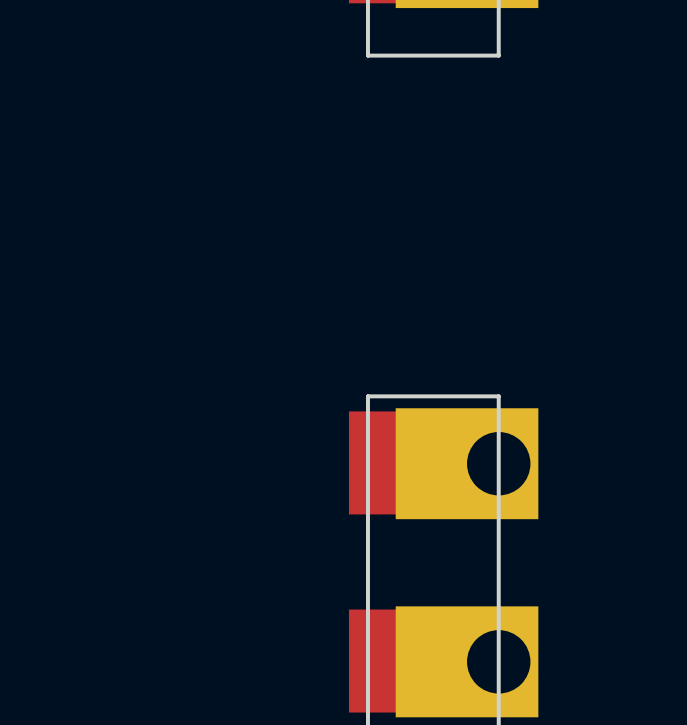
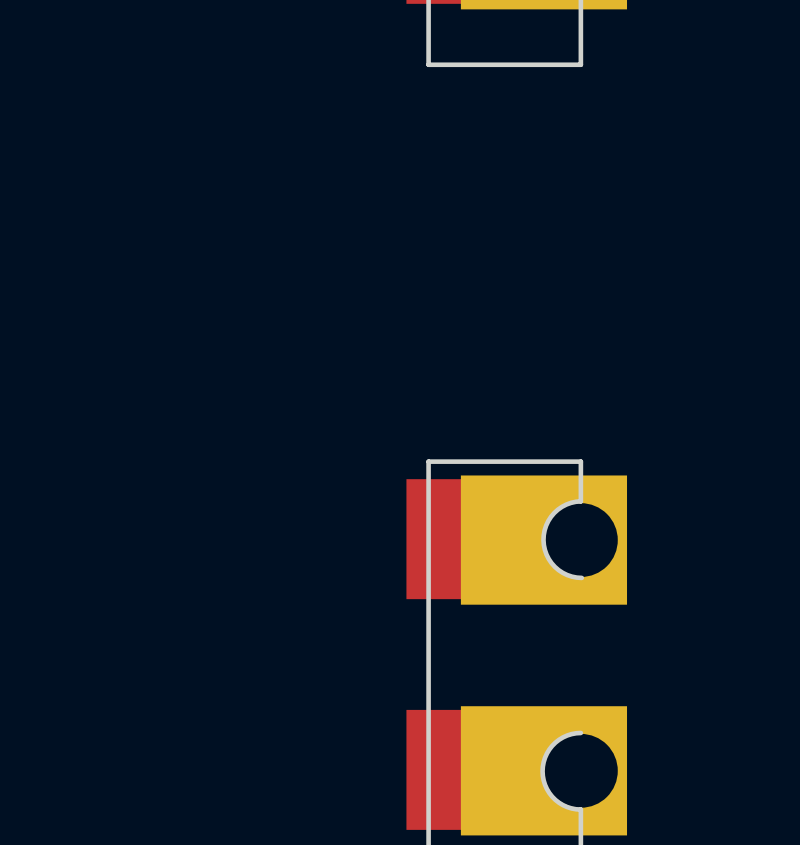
board edge: (498, 430) (498, 695) -> (580, 732) (567, 735) (552, 745) (545, 757) (542, 771) (546, 789) (555, 799) (567, 807) (580, 809)
board edge: none -> (580, 501) (566, 504) (554, 513) (546, 525) (543, 540) (546, 554) (554, 566) (567, 575) (581, 577)

